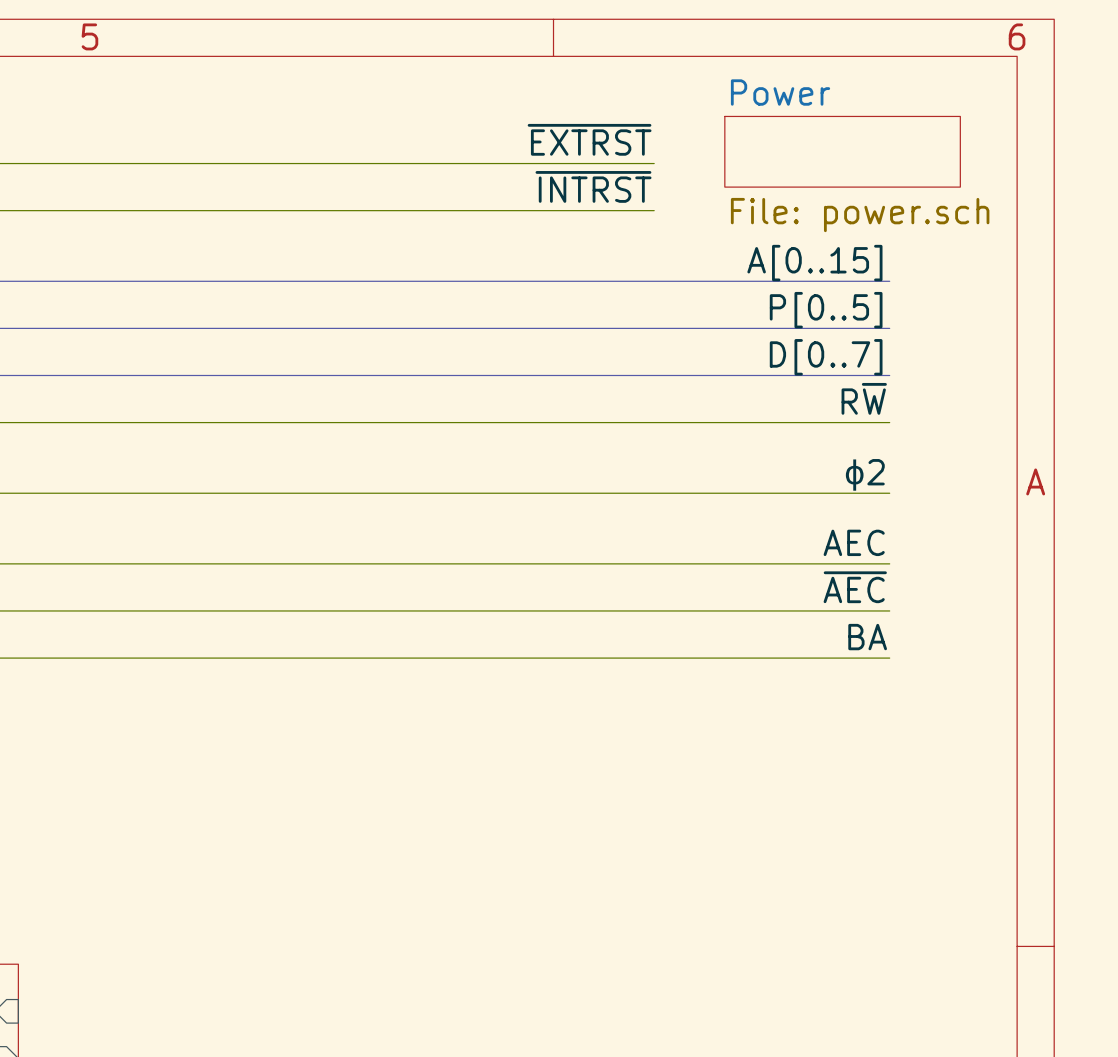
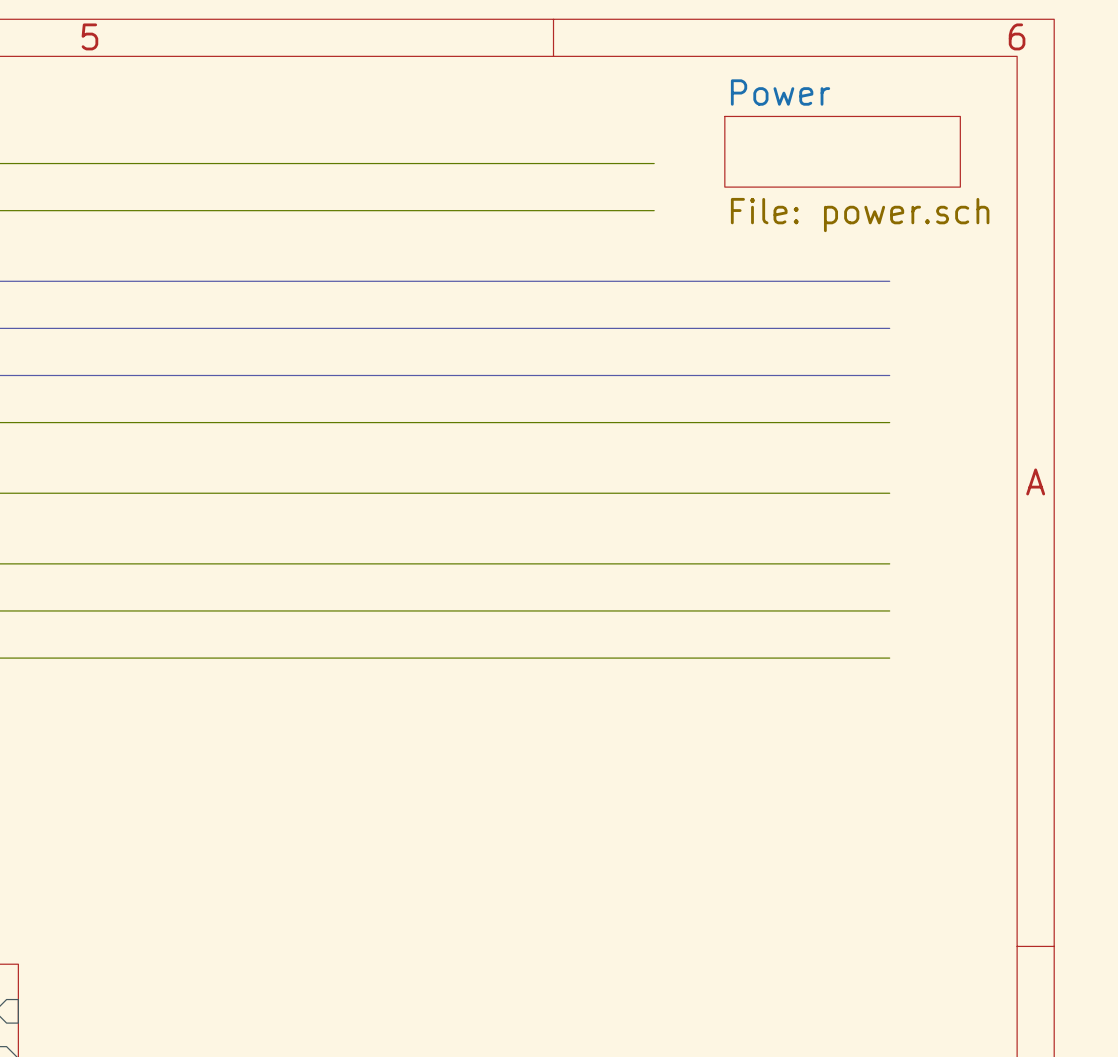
label: ~{EXTRST} (589, 139) -> none
label: ~{INTRST} (593, 186) -> none
label: A[0..15] (814, 263) -> none
label: P[0..5] (826, 310) -> none
label: D[0..7] (826, 357) -> none
label: R~{W} (864, 398) -> none
label: ϕ2 (864, 475) -> none
label: AEC (854, 542) -> none
label: ~{AEC} (855, 587) -> none
label: BA (867, 637) -> none

